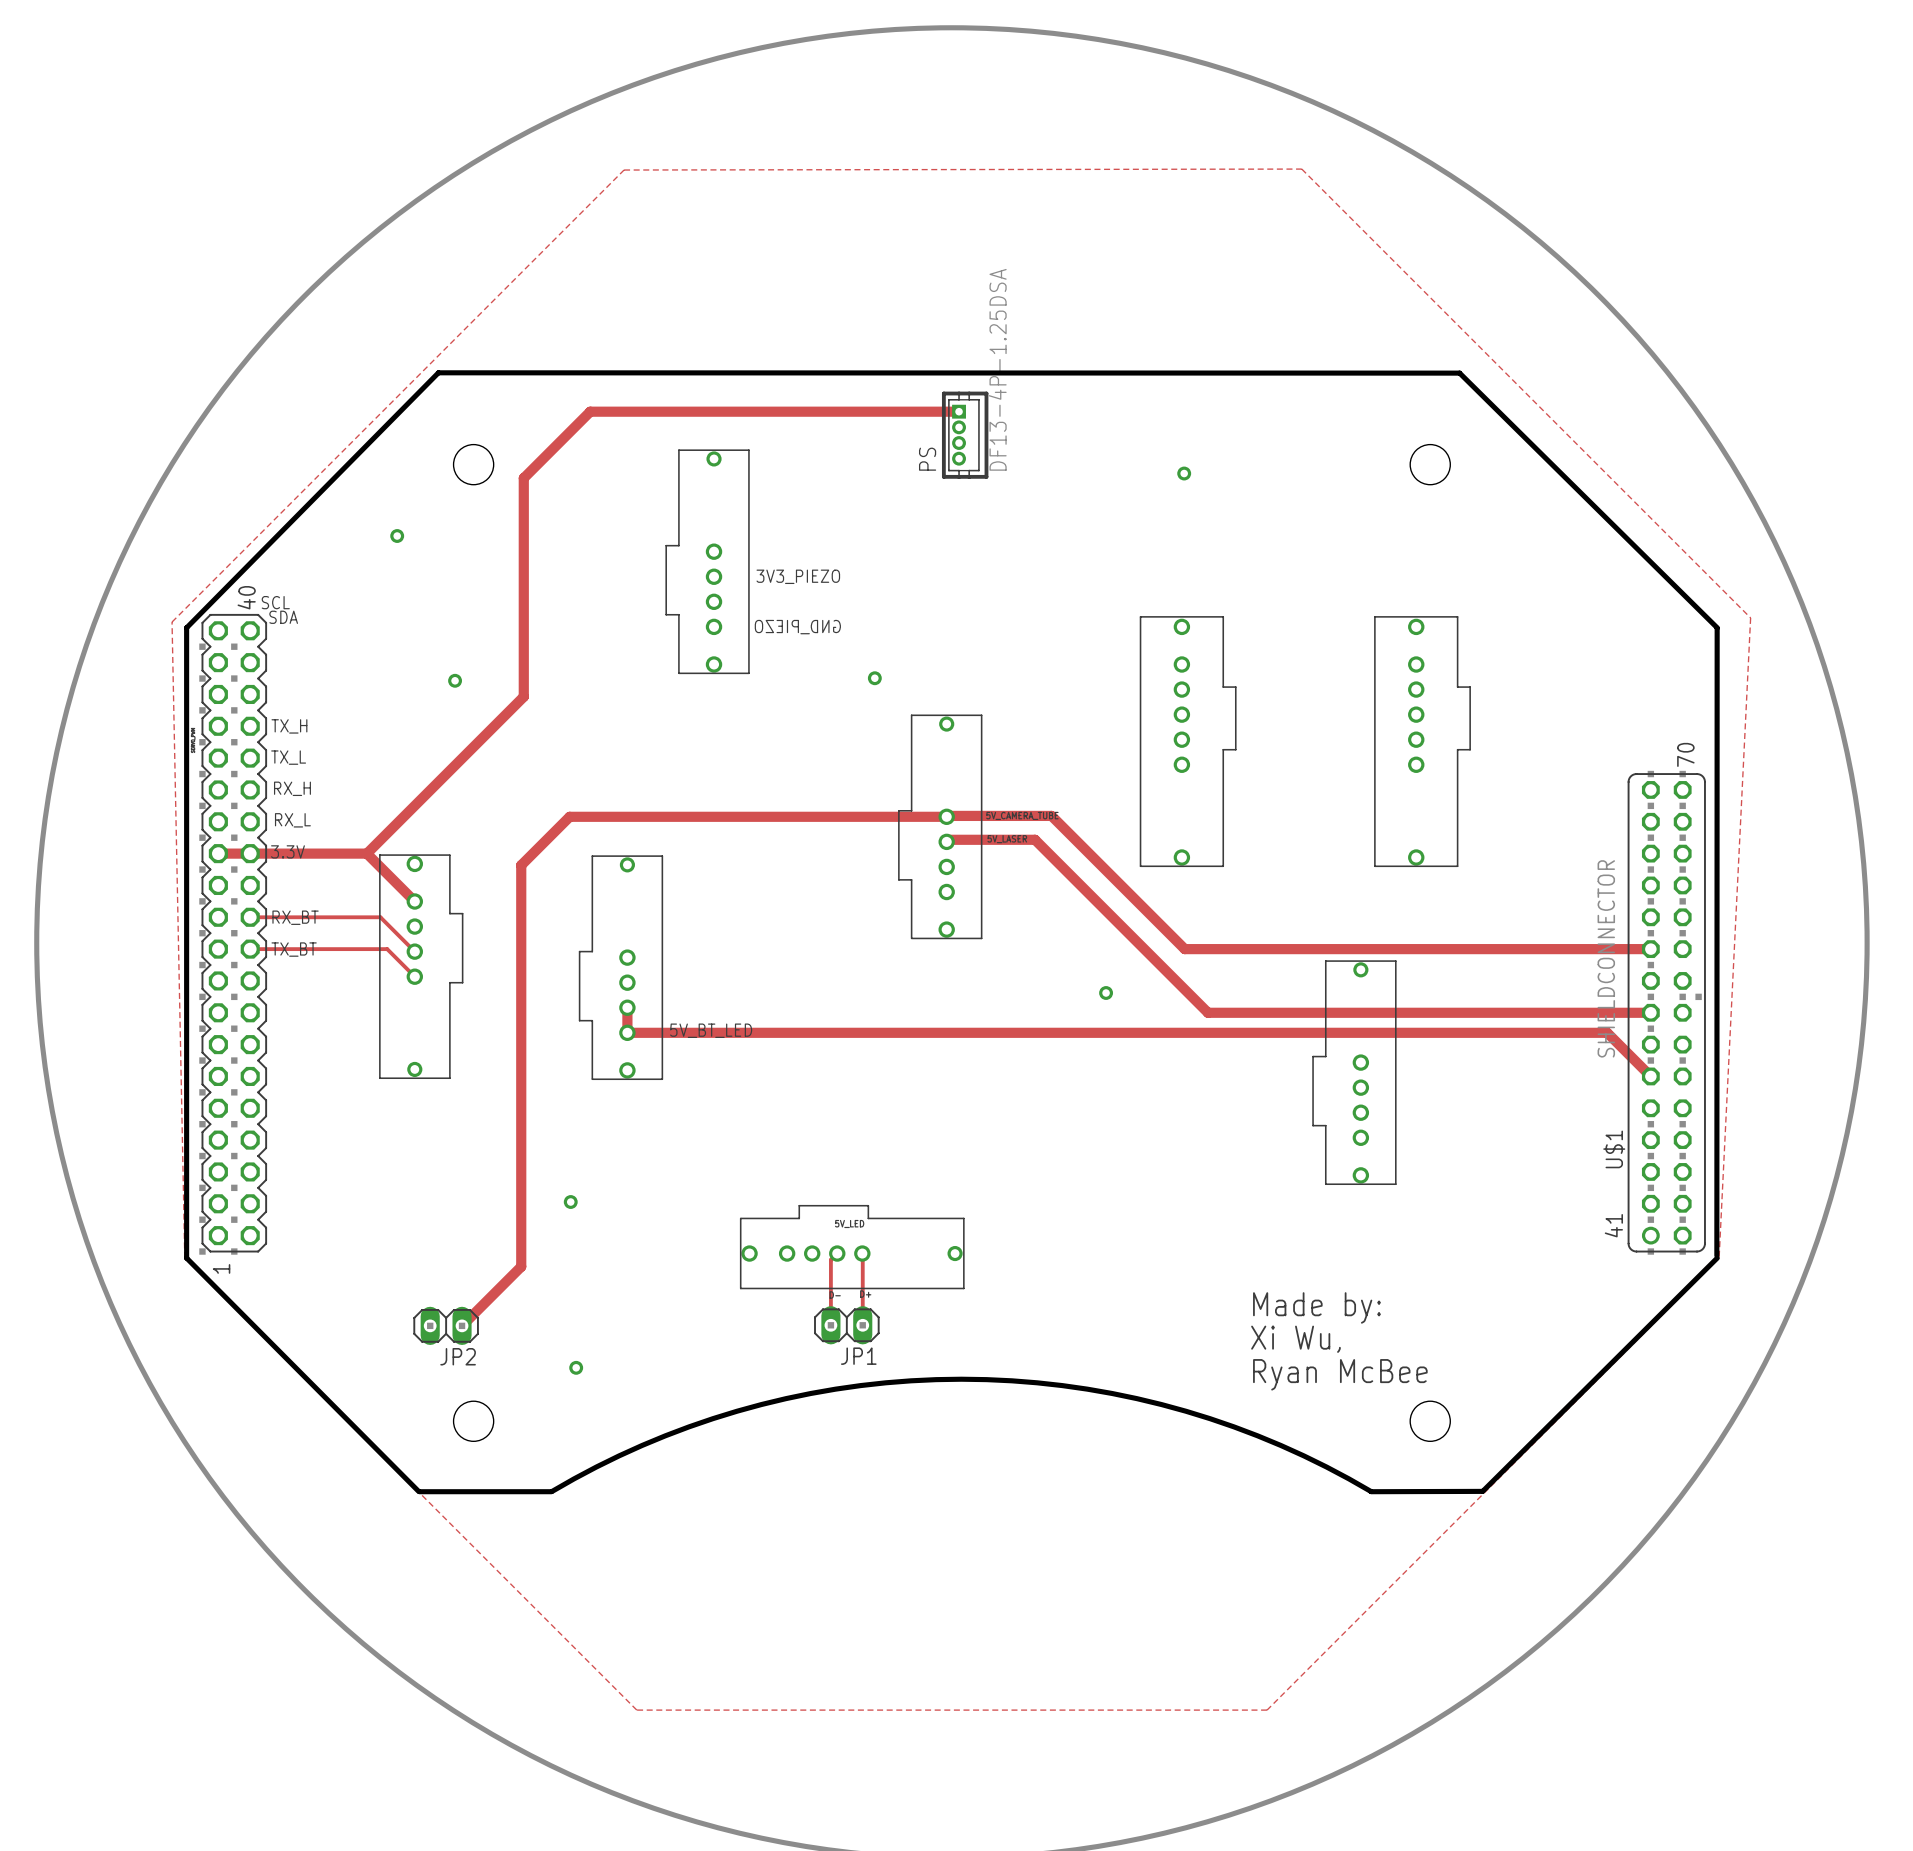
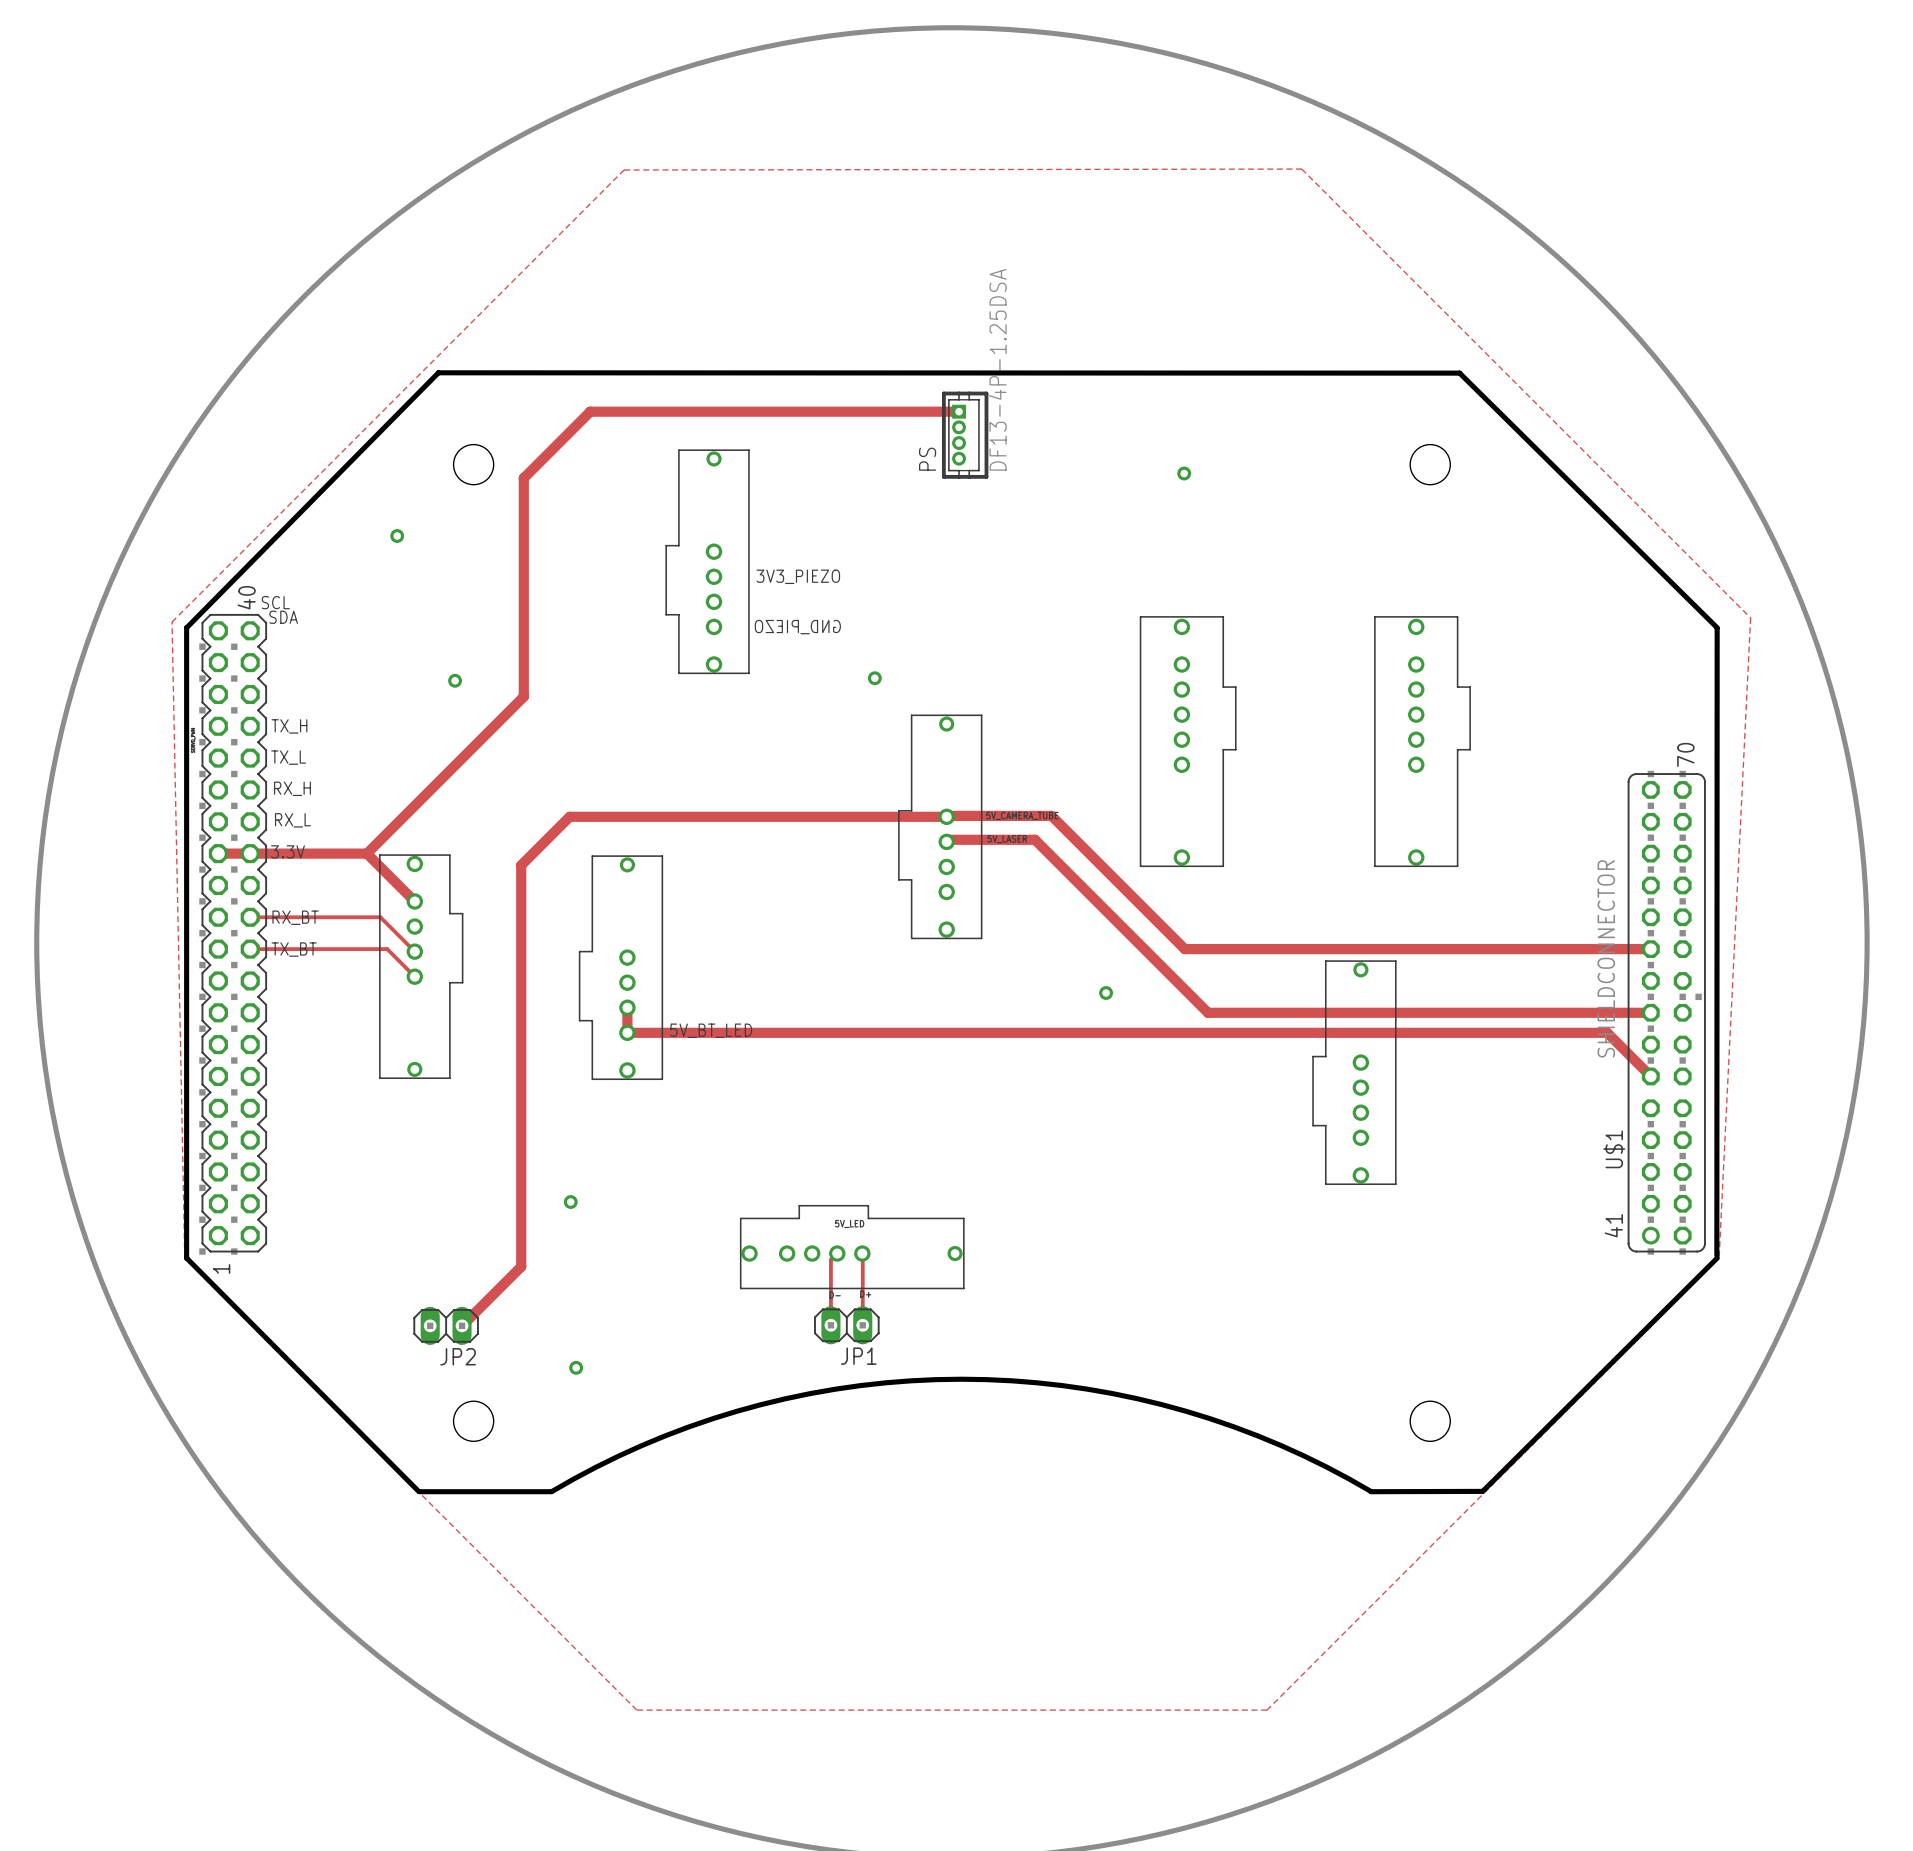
text: Made by: (1316, 1307) -> none
text: Xi Wu, (1295, 1339) -> none
text: Ryan McBee (1340, 1374) -> none

